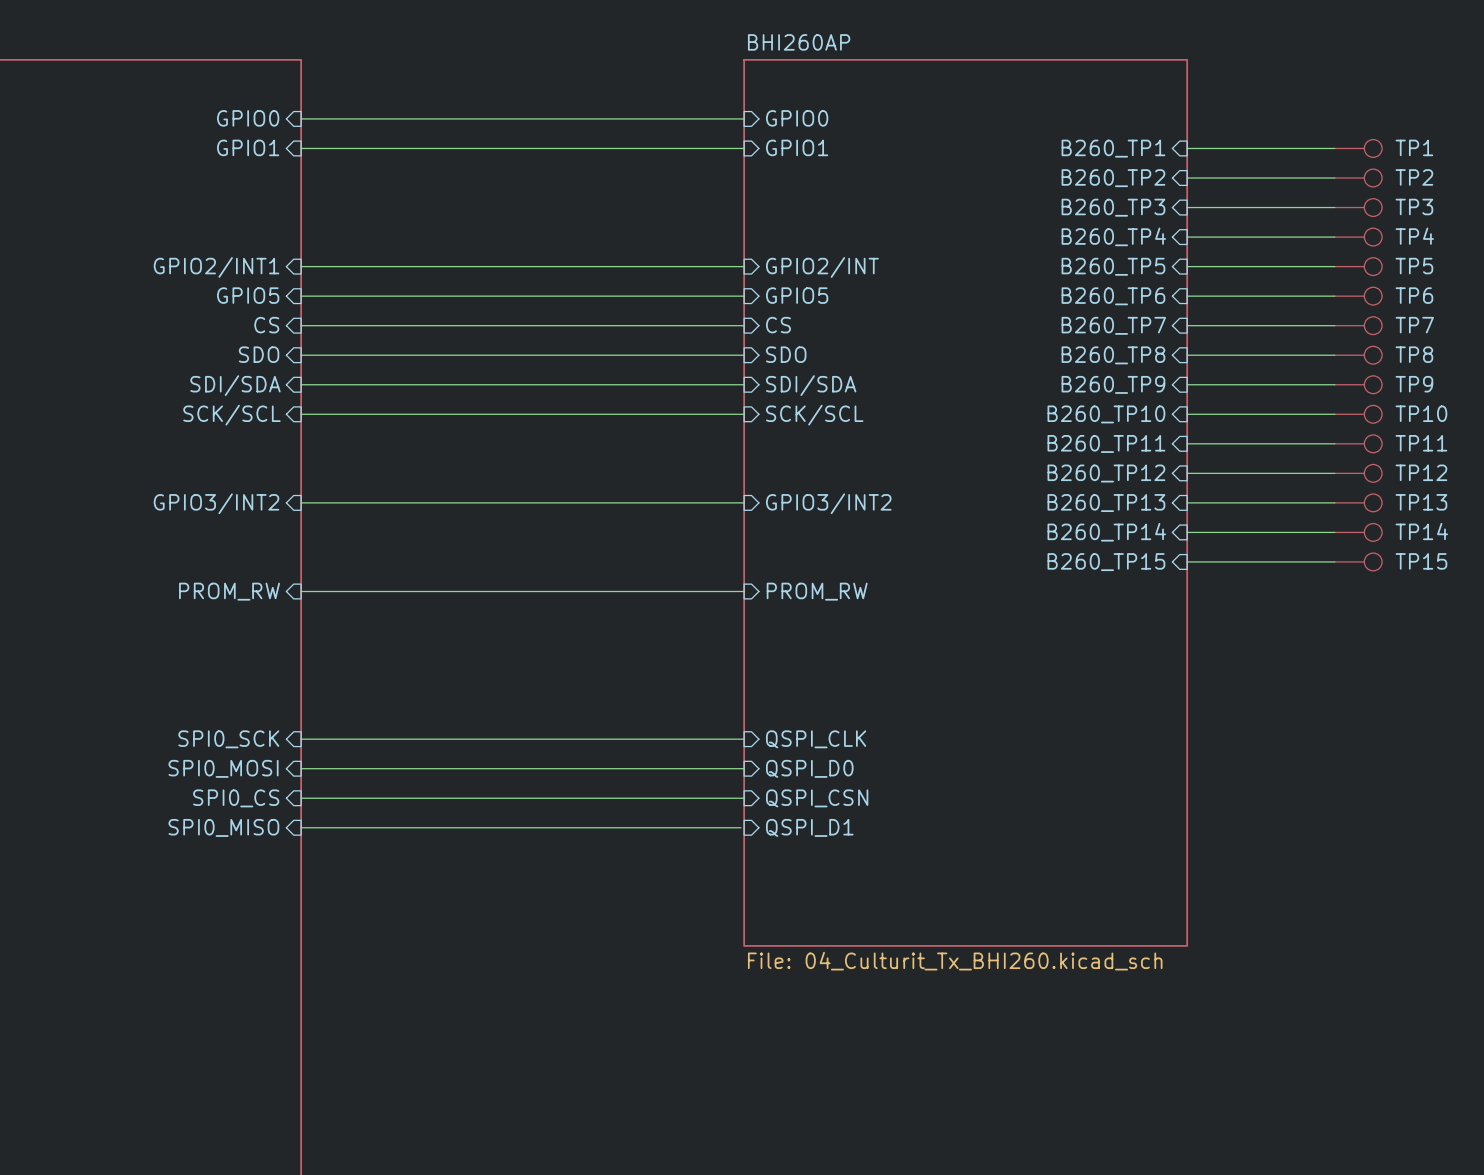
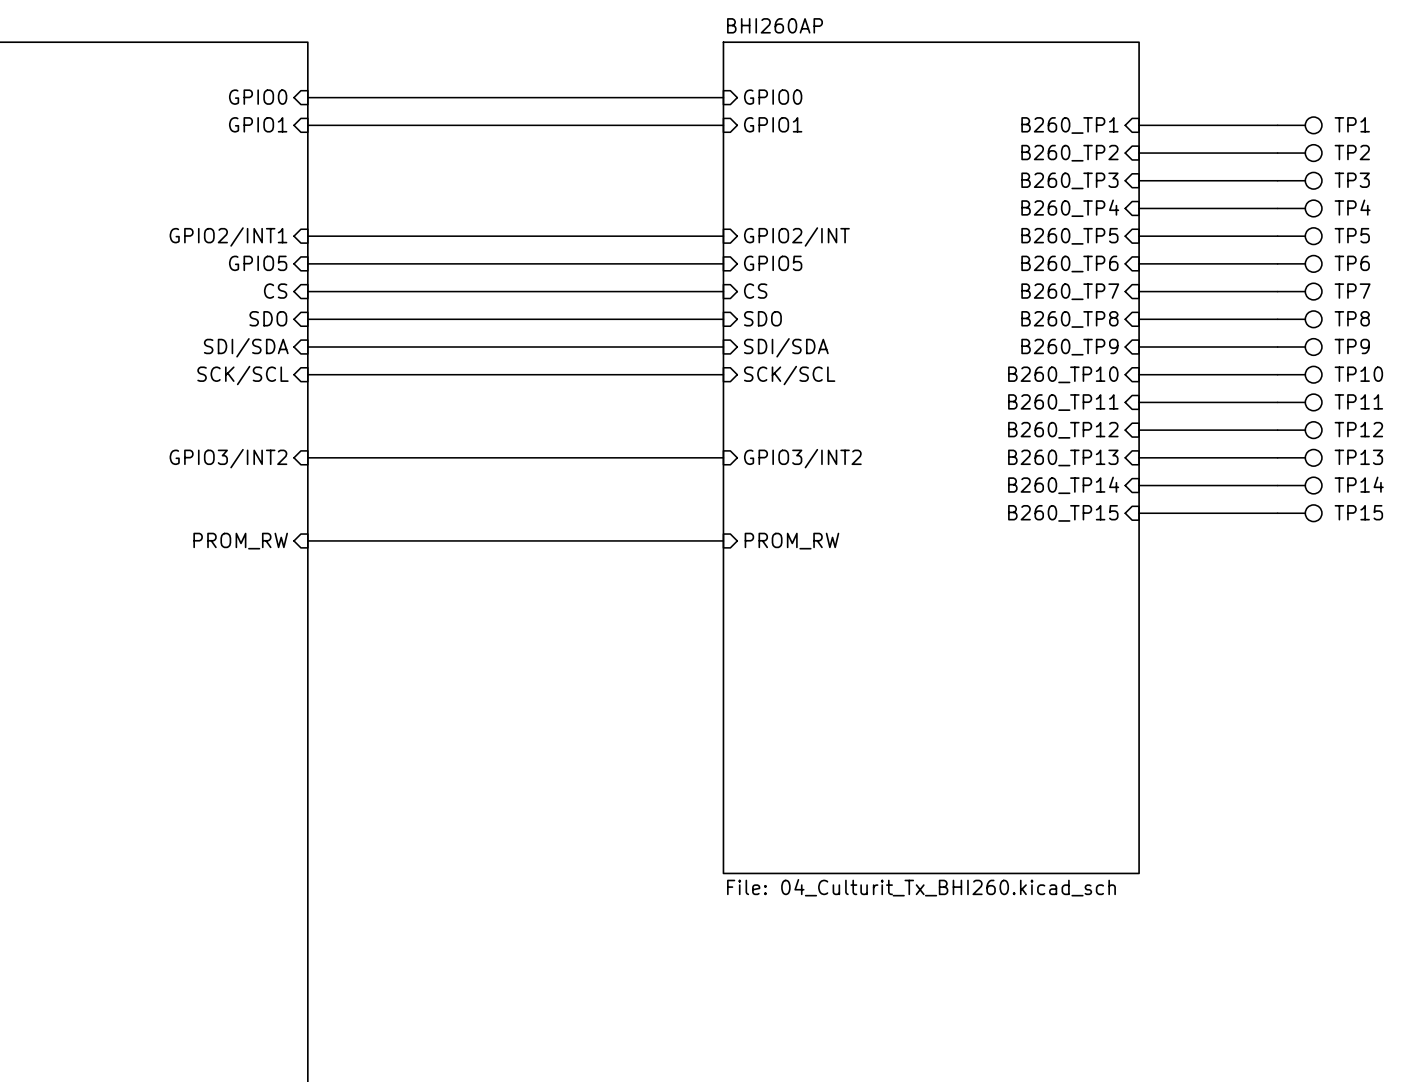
sheet pin: SPI0_SCK (228, 739) -> none
wire: (301, 739) (744, 739) -> none
sheet pin: QSPI_CLK (816, 739) -> none
sheet pin: SPI0_MOSI (223, 768) -> none
wire: (301, 768) (744, 768) -> none
sheet pin: QSPI_D0 (809, 768) -> none
sheet pin: SPI0_CS (236, 798) -> none
wire: (301, 798) (744, 798) -> none
sheet pin: QSPI_CSN (817, 798) -> none
sheet pin: SPI0_MISO (223, 827) -> none
wire: (301, 827) (740, 827) -> none
sheet pin: QSPI_D1 (809, 827) -> none

